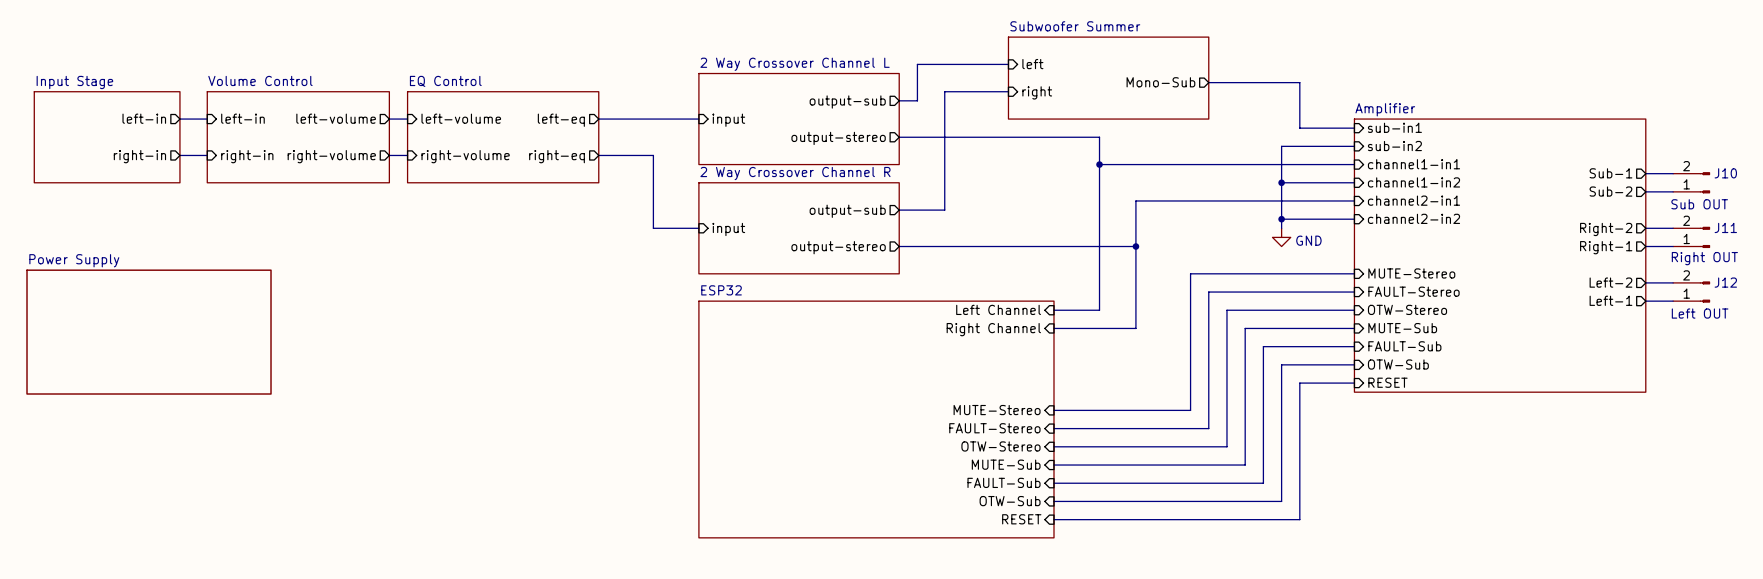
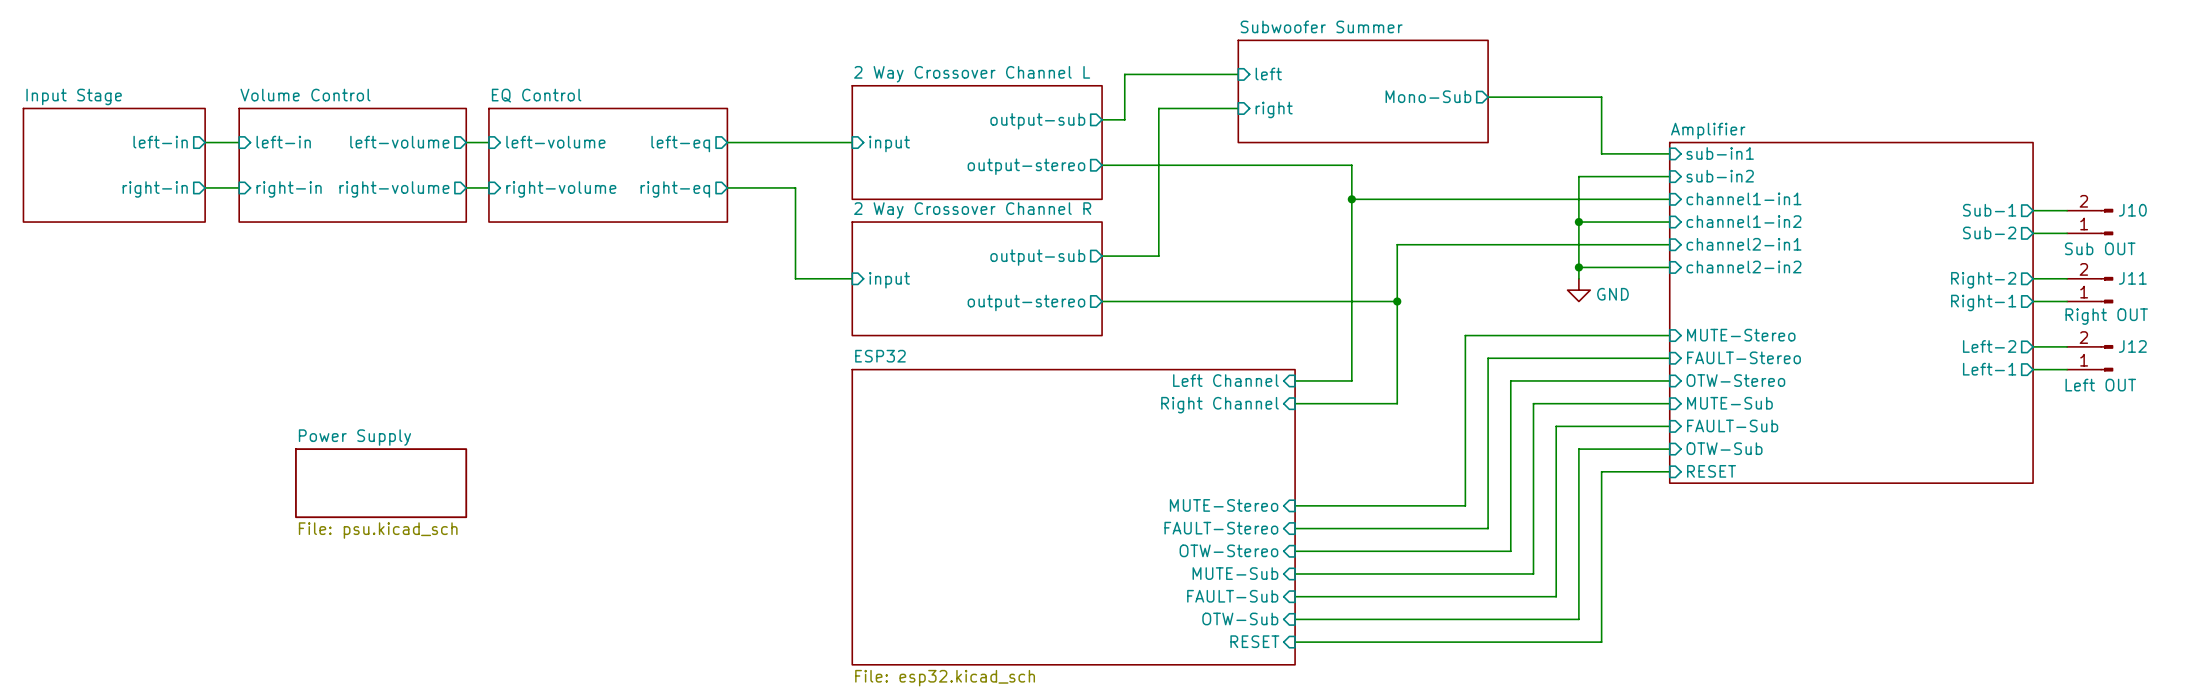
sheet Power Supply: (149, 332) -> none
sheet Power Supply: none -> File: psu.kicad_sch (381, 483)
sheet ESP32 value: none -> File: esp32.kicad_sch (945, 678)

